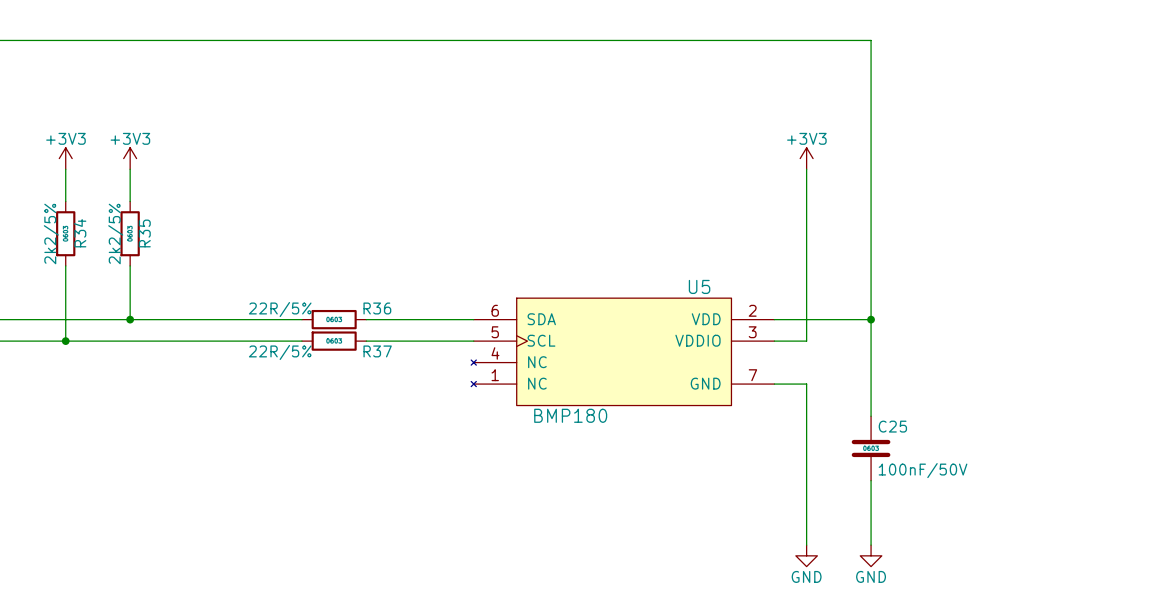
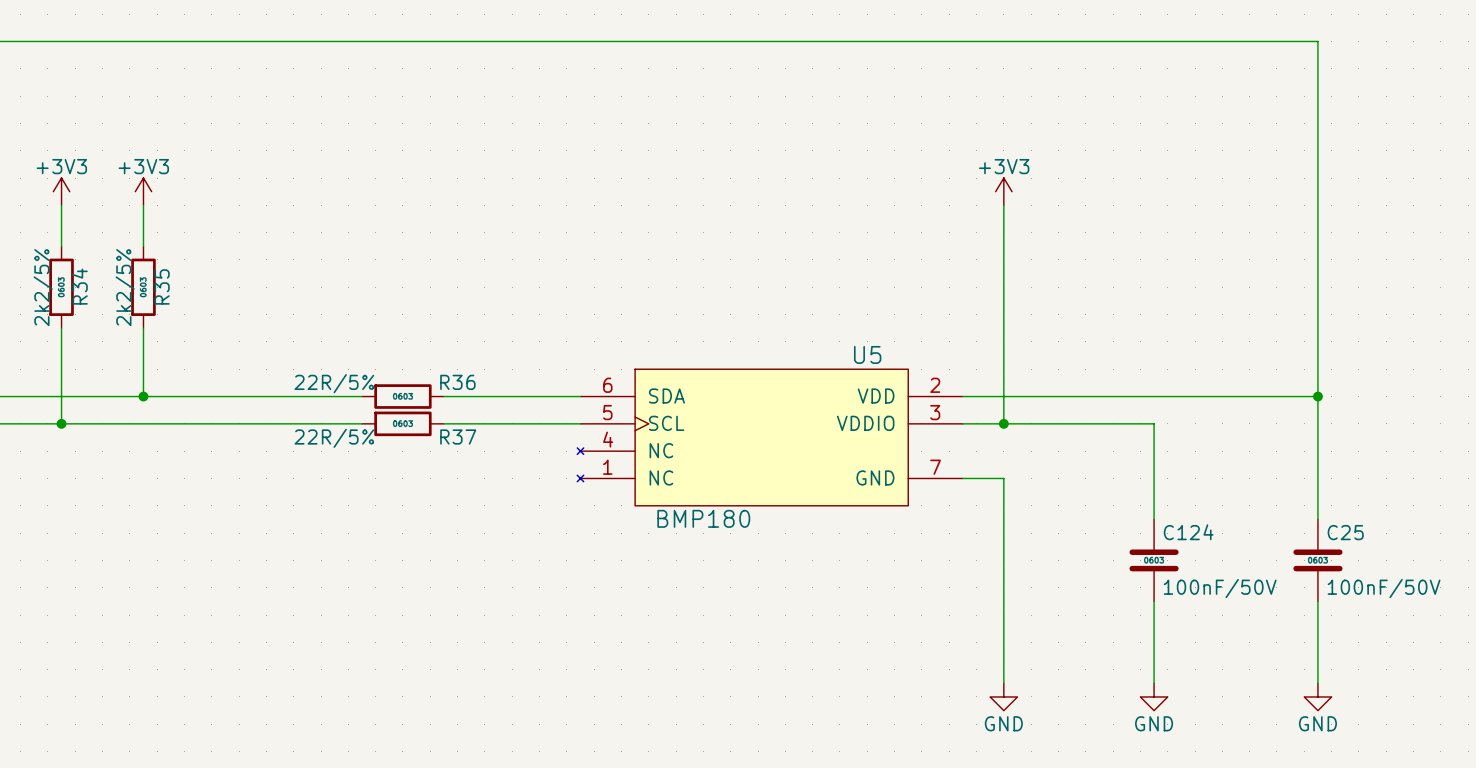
wire: (871, 40) (871, 416) -> (1085, 41) (1317, 41) (1317, 519)
wire: none -> (1085, 396) (1317, 396)
junction: (871, 319) -> none
junction: none -> (1317, 396)
wire: none -> (1003, 423) (1154, 423) (1154, 519)
junction: none -> (1003, 423)
C25 position: (871, 448) -> (1317, 560)
C124: none -> 100nF/50V (1154, 560)
wire: (871, 480) (871, 545) -> (1154, 601) (1154, 683)
wire: none -> (1317, 601) (1317, 683)
power symbol position: GND (871, 555) -> GND (1154, 696)
power symbol: none -> GND (1317, 696)

